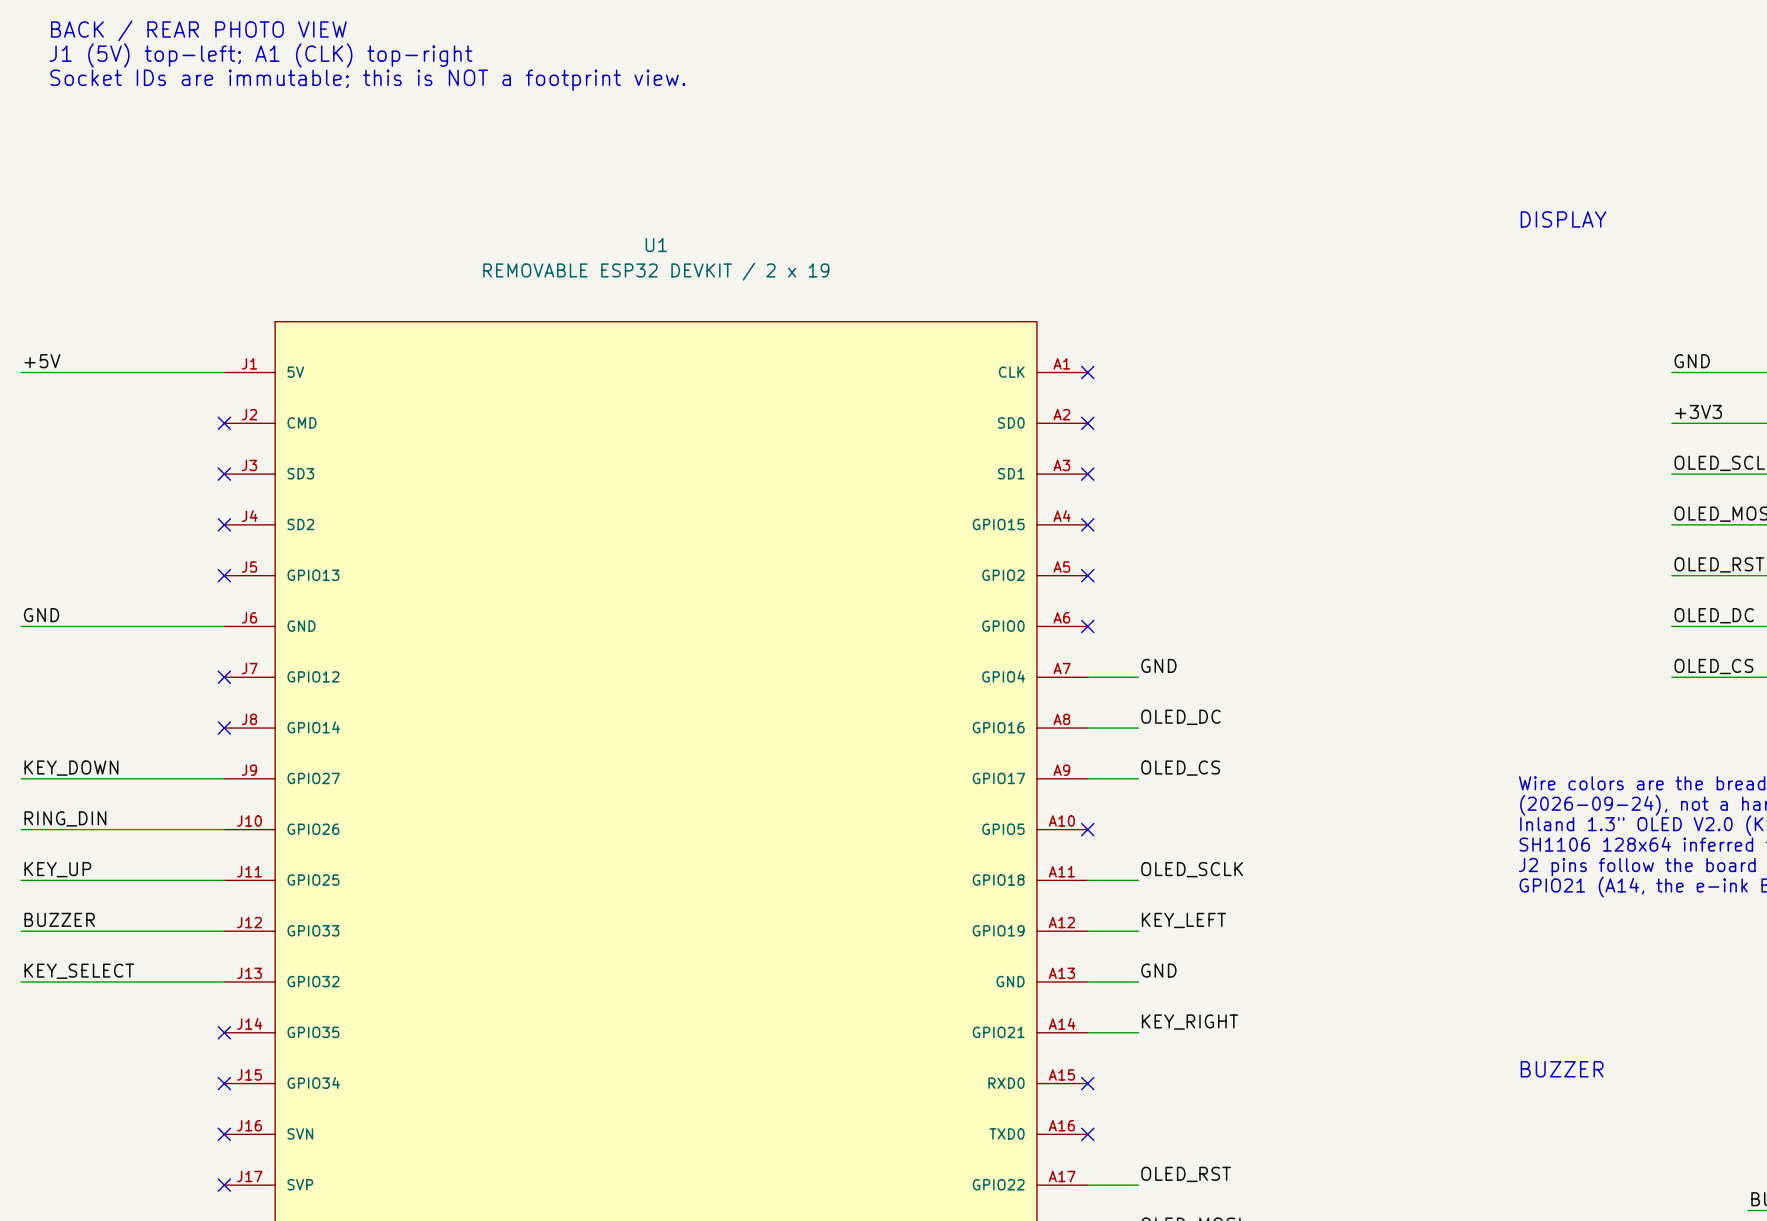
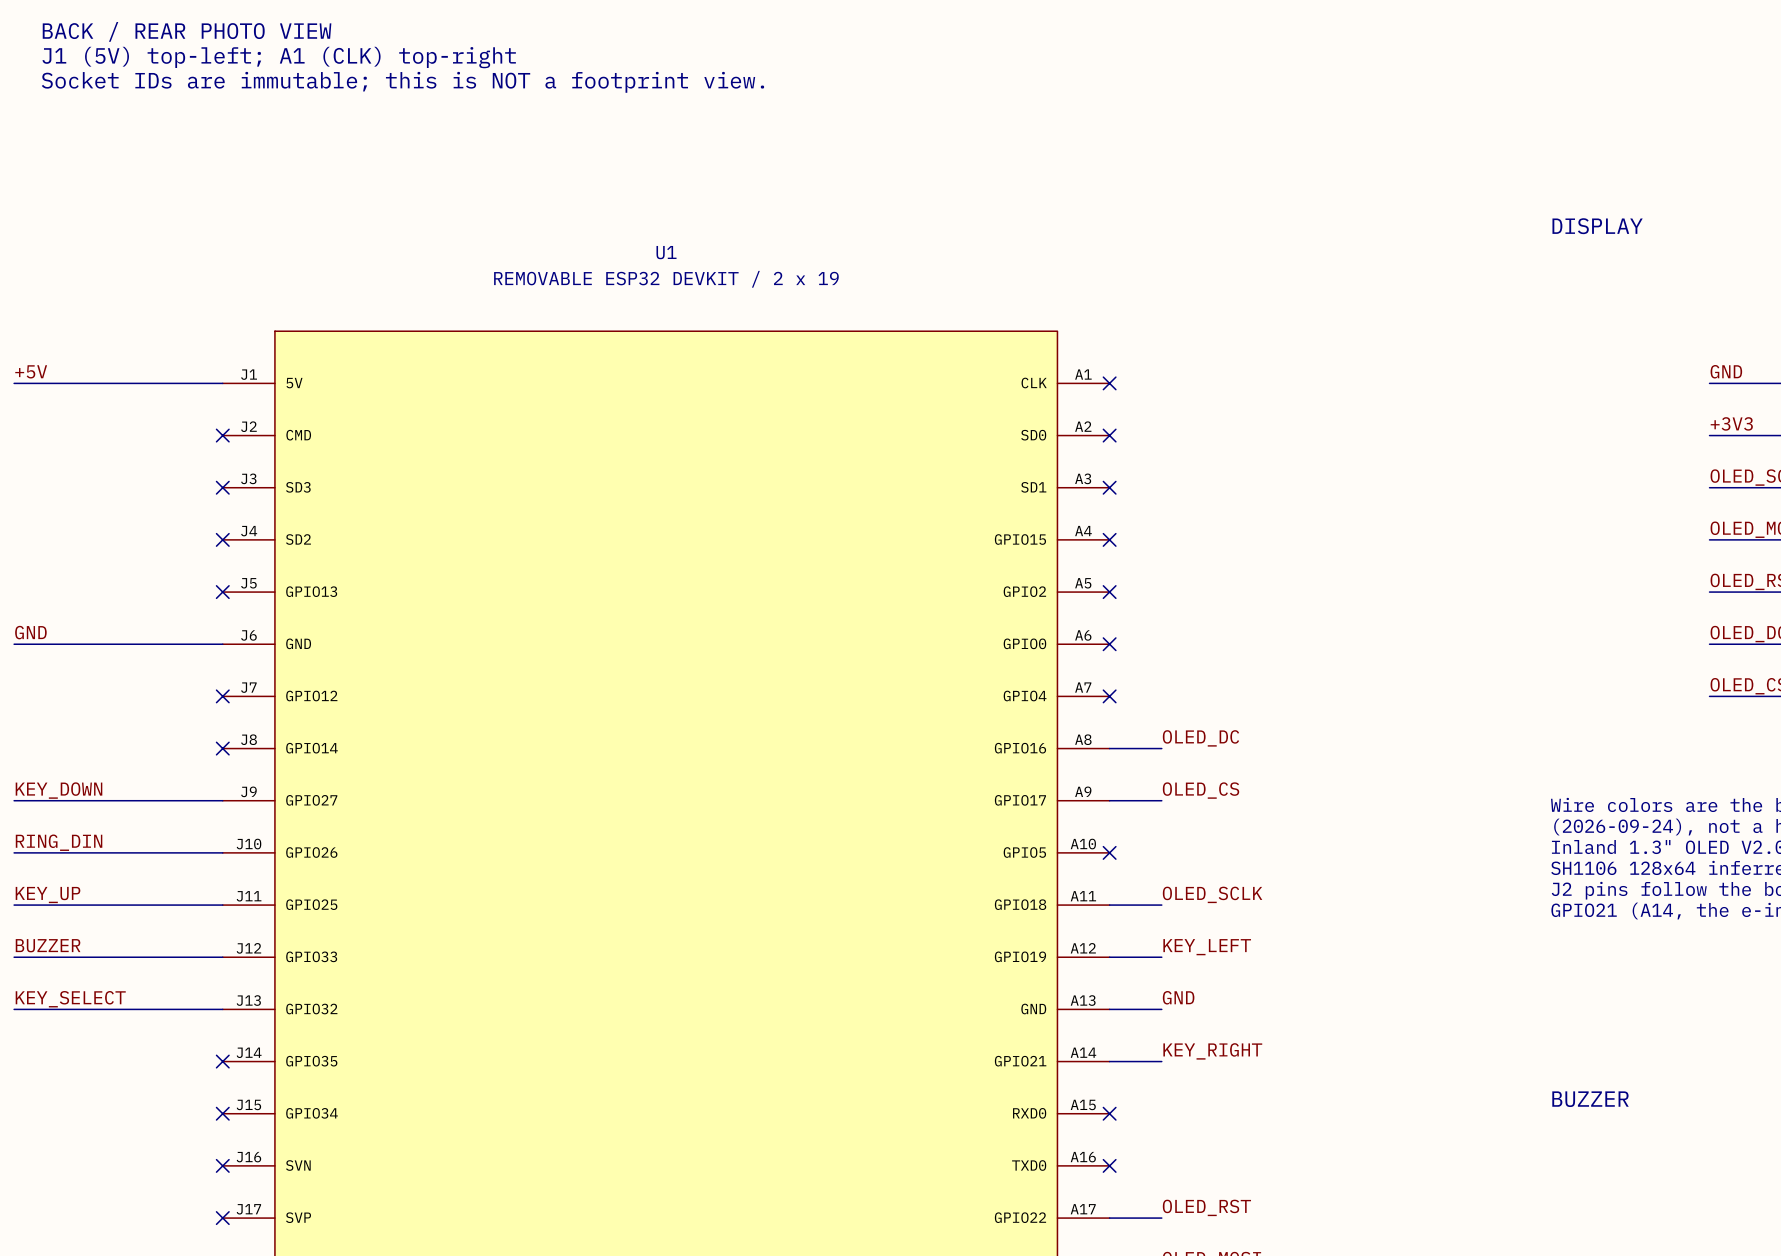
label: GND (1158, 665) -> none
wire: (1087, 677) (1138, 677) -> none
no-connect mark: none -> (1109, 696)

